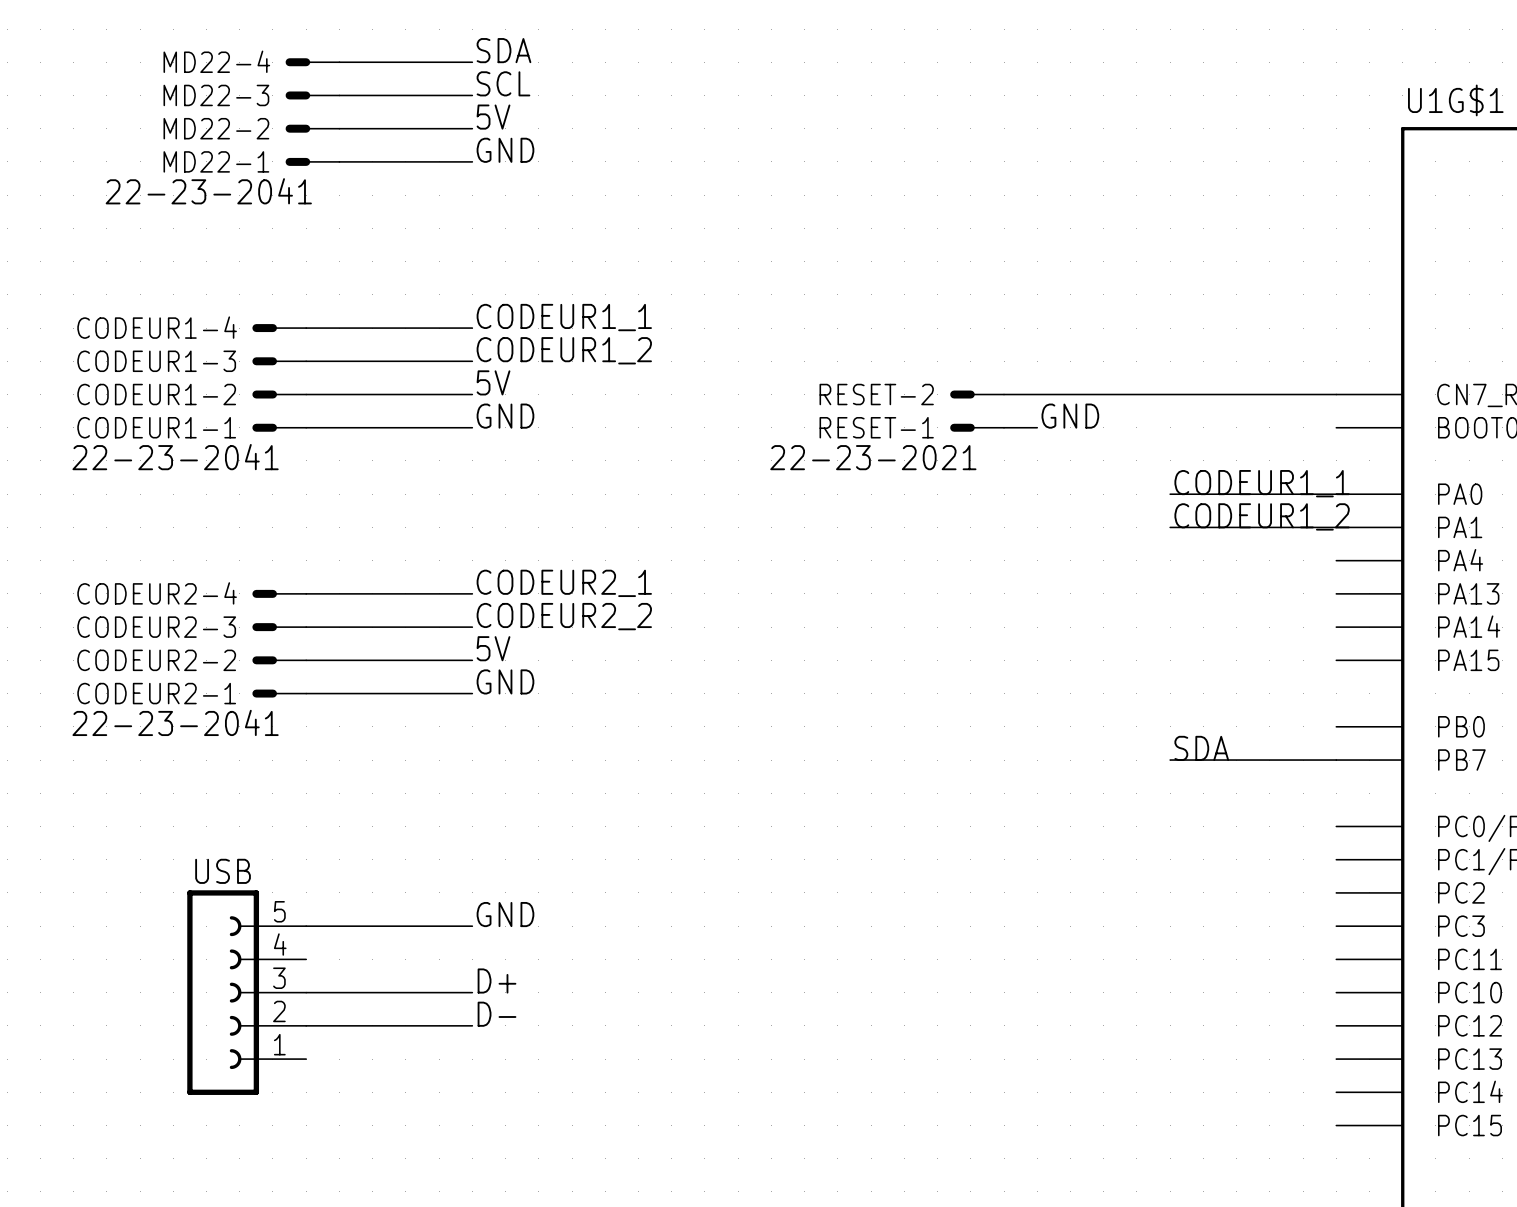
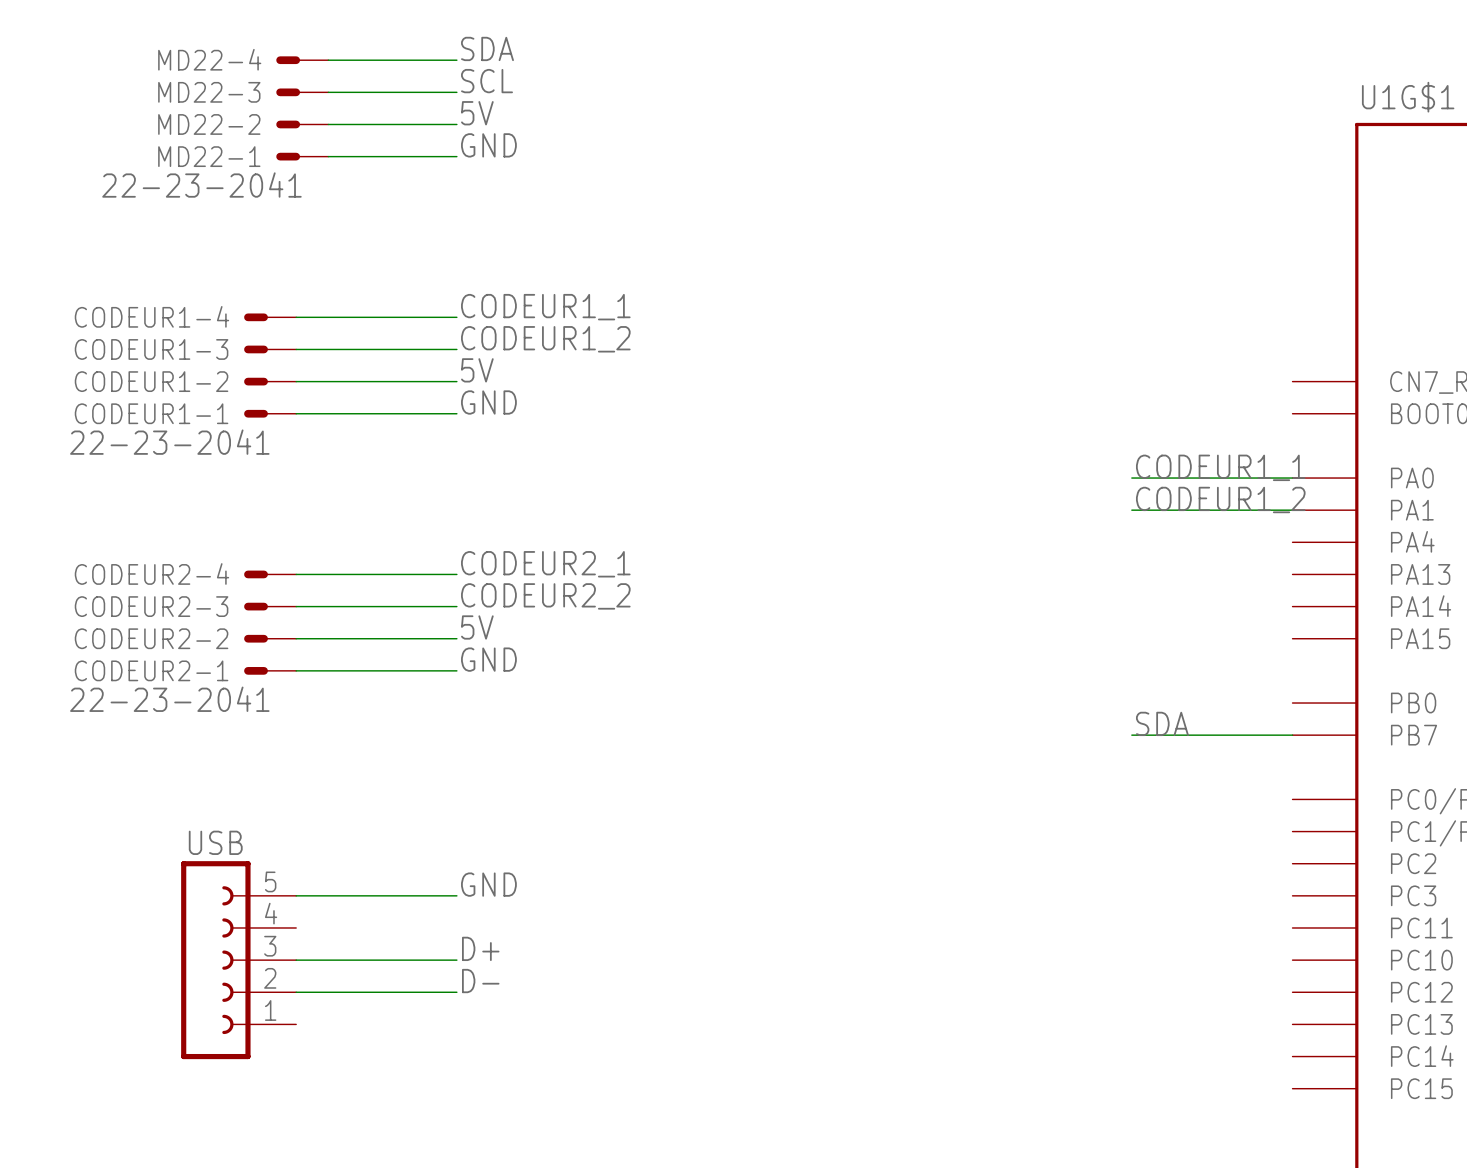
RESET-2: (977, 394) -> none
wire: (1004, 394) (1336, 394) -> none
label: GND (1070, 416) -> none
RESET-1: 22-23-2021 (977, 427) -> none
wire: (1004, 427) (1037, 427) -> none

